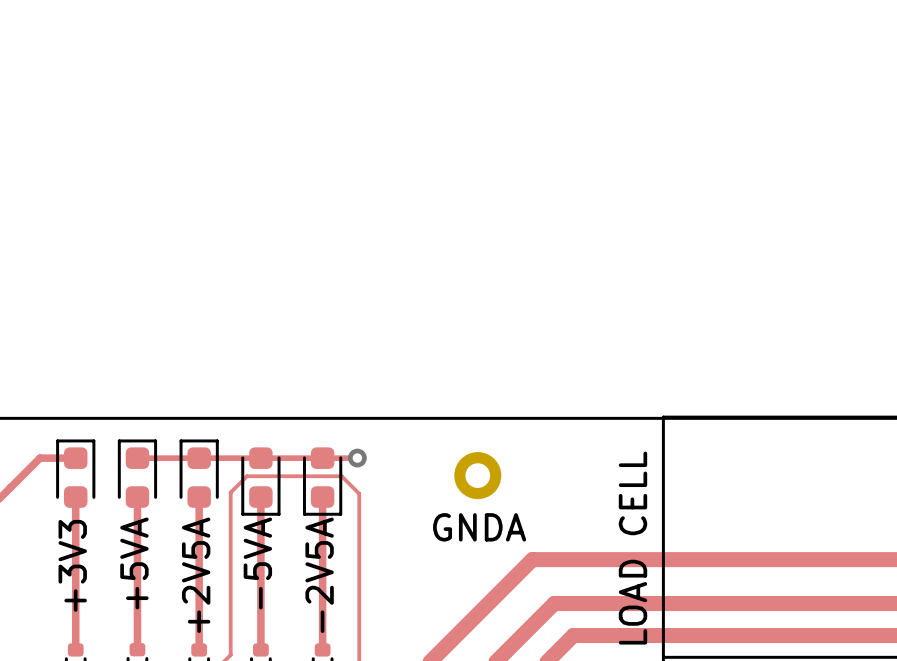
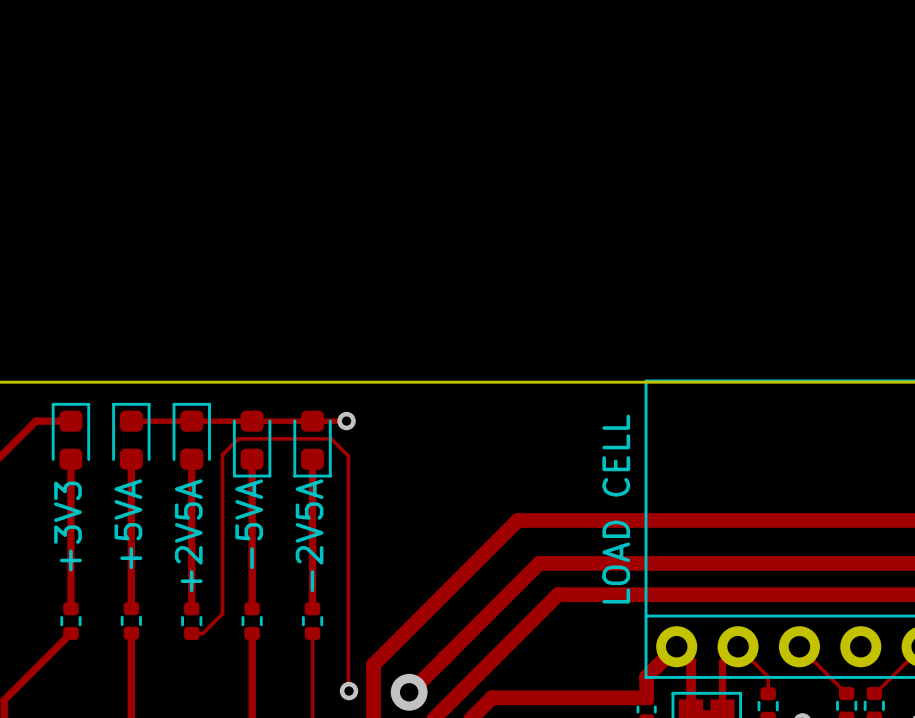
part: (477, 475) -> none
text: GNDA (479, 527) -> none

